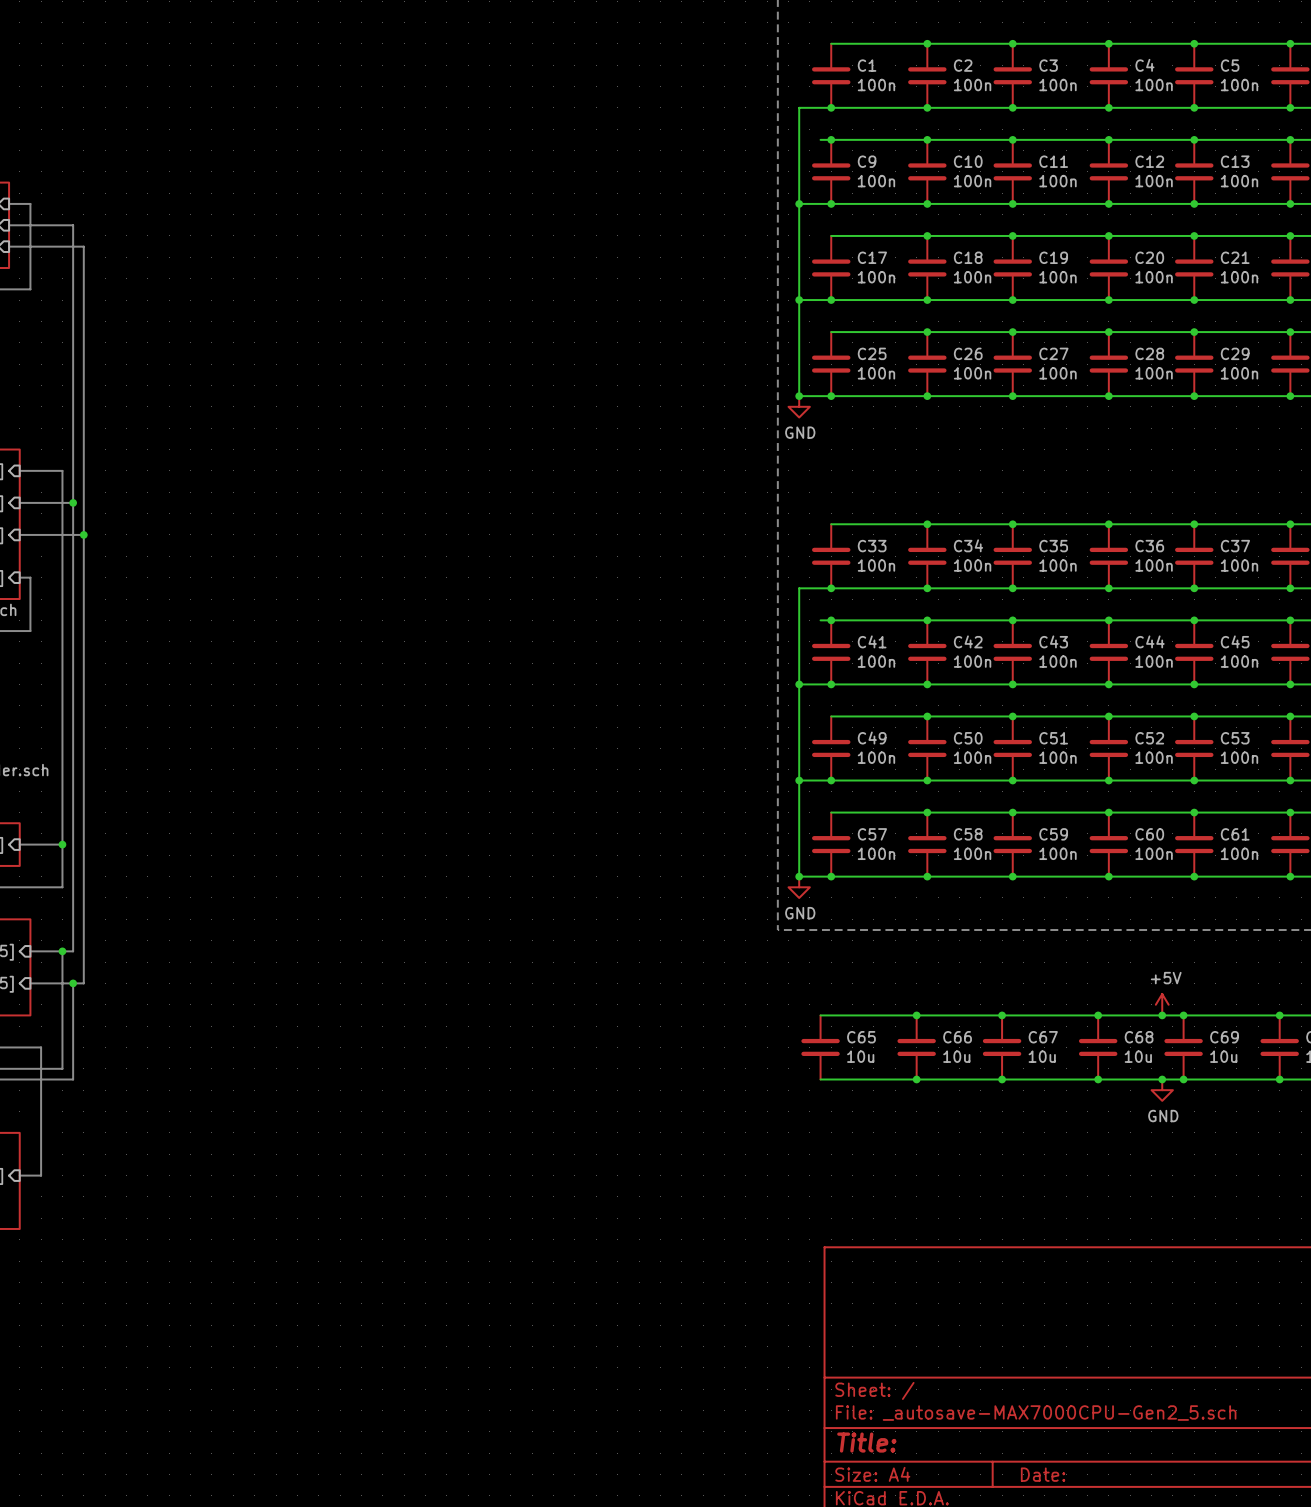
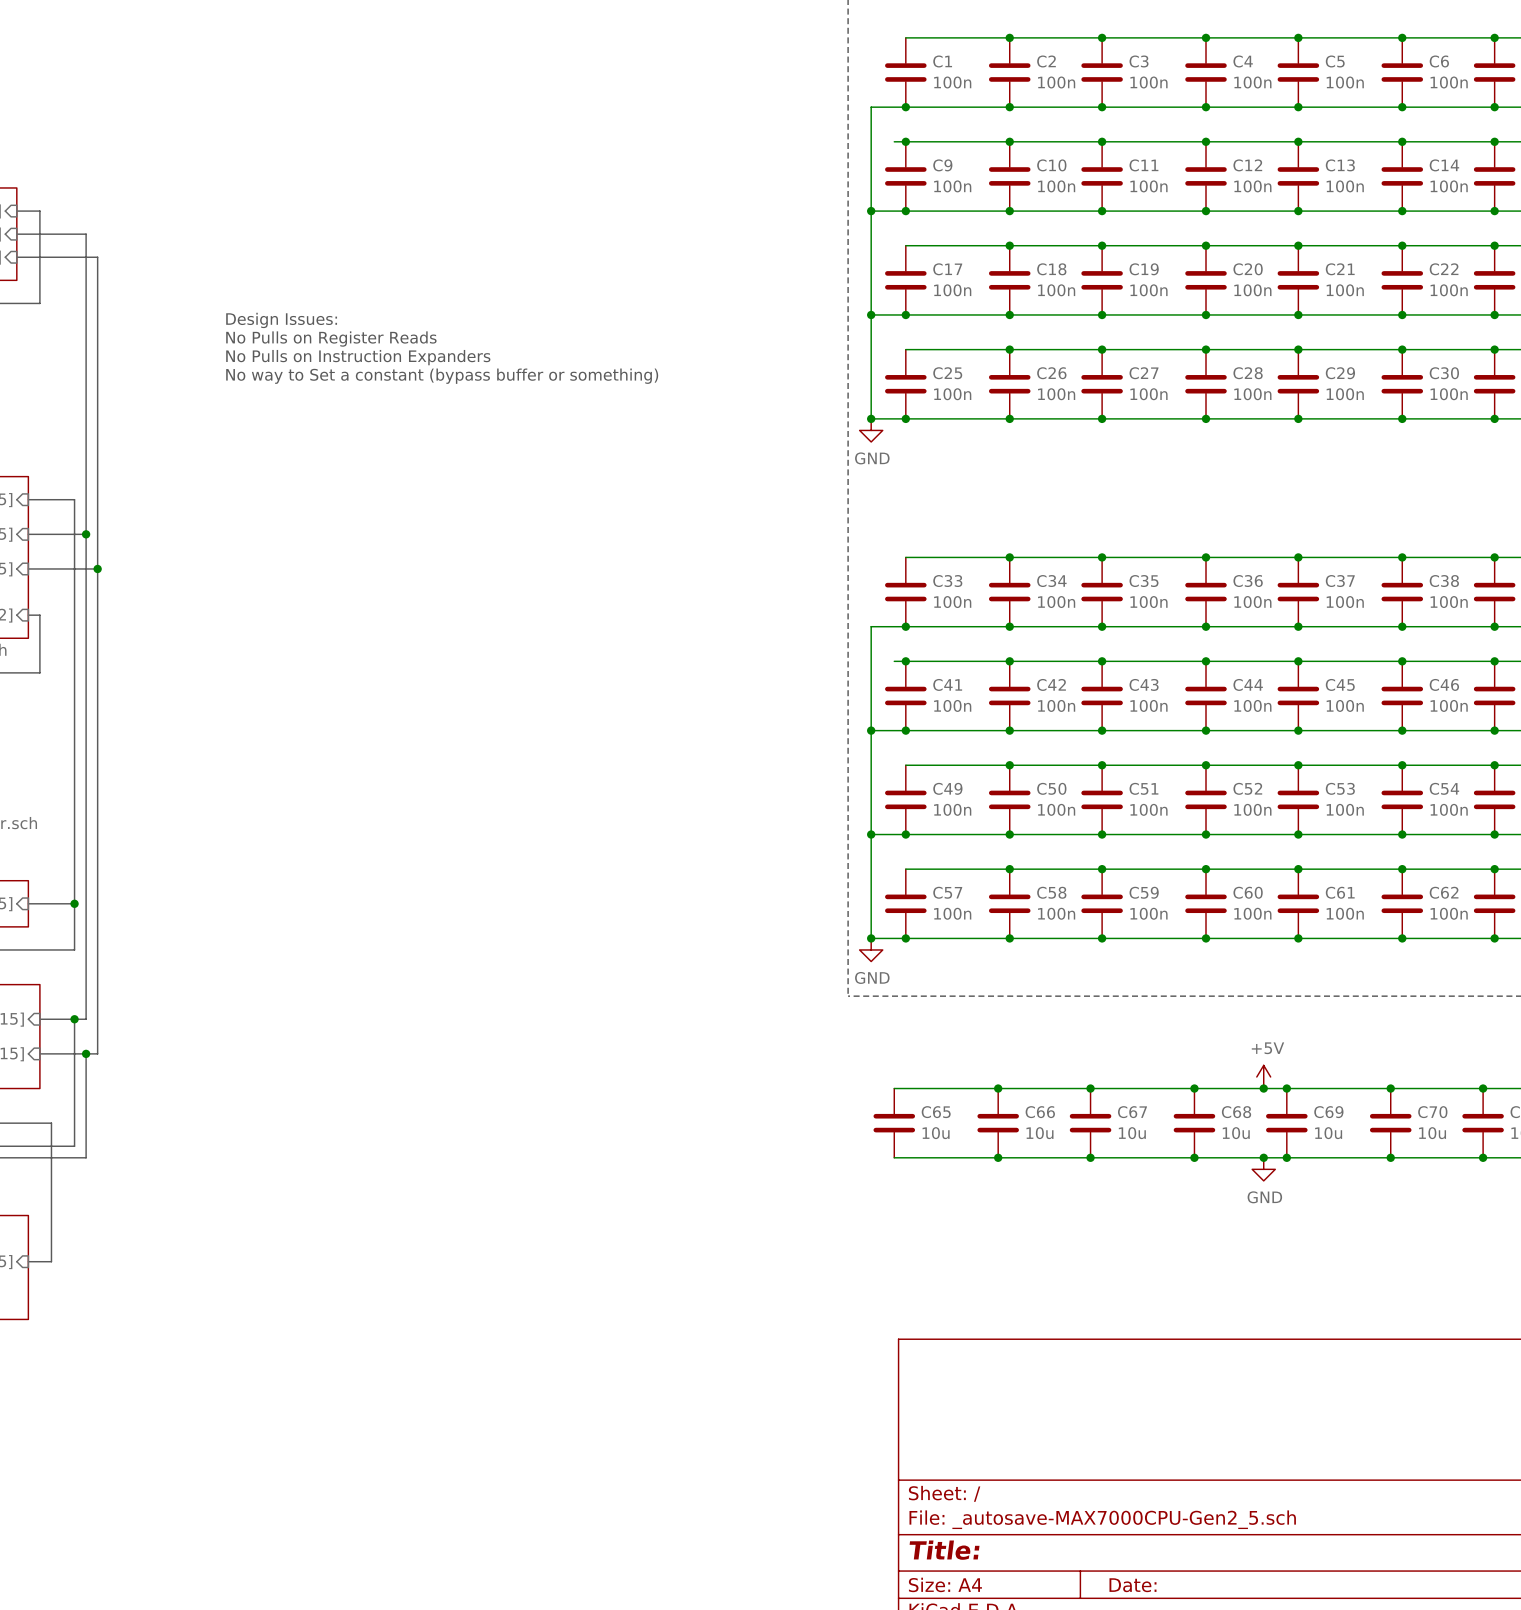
text: none -> Design Issues: (281, 320)
text: none -> No Pulls on Register Reads (331, 339)
text: none -> No Pulls on Instruction Expanders (358, 357)
text: none -> No way to Set a constant (bypass buffer or something) (442, 376)

